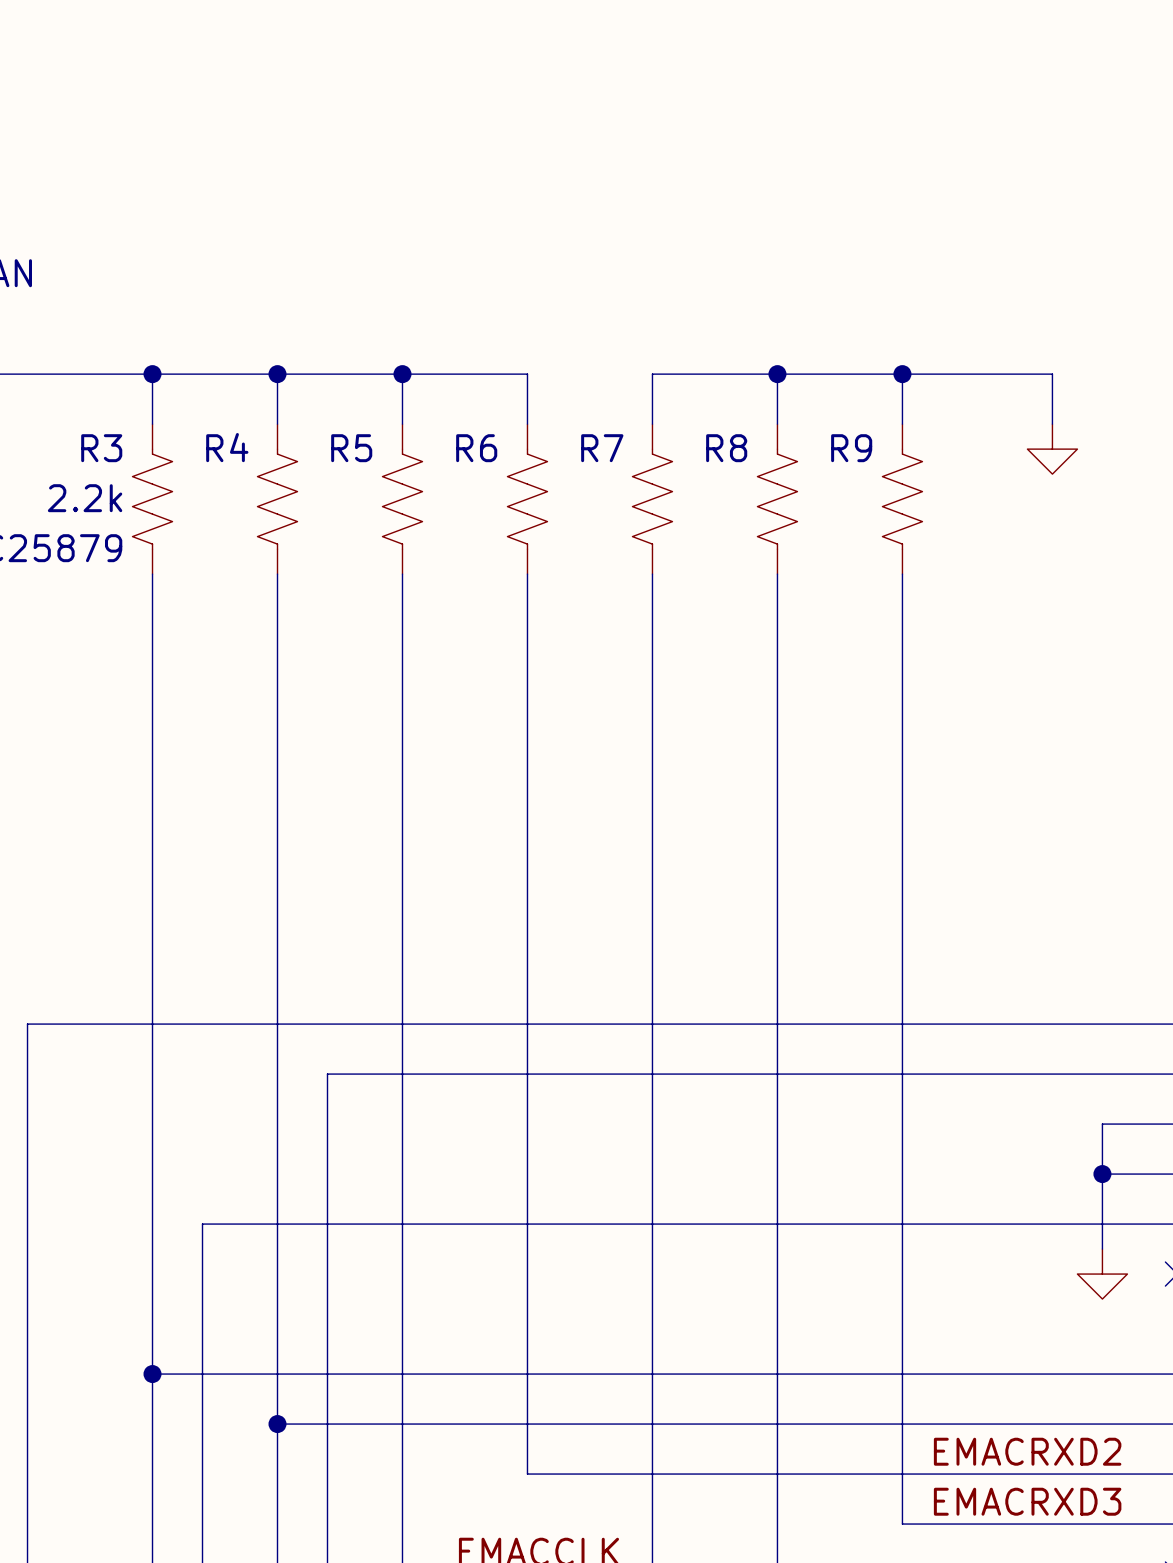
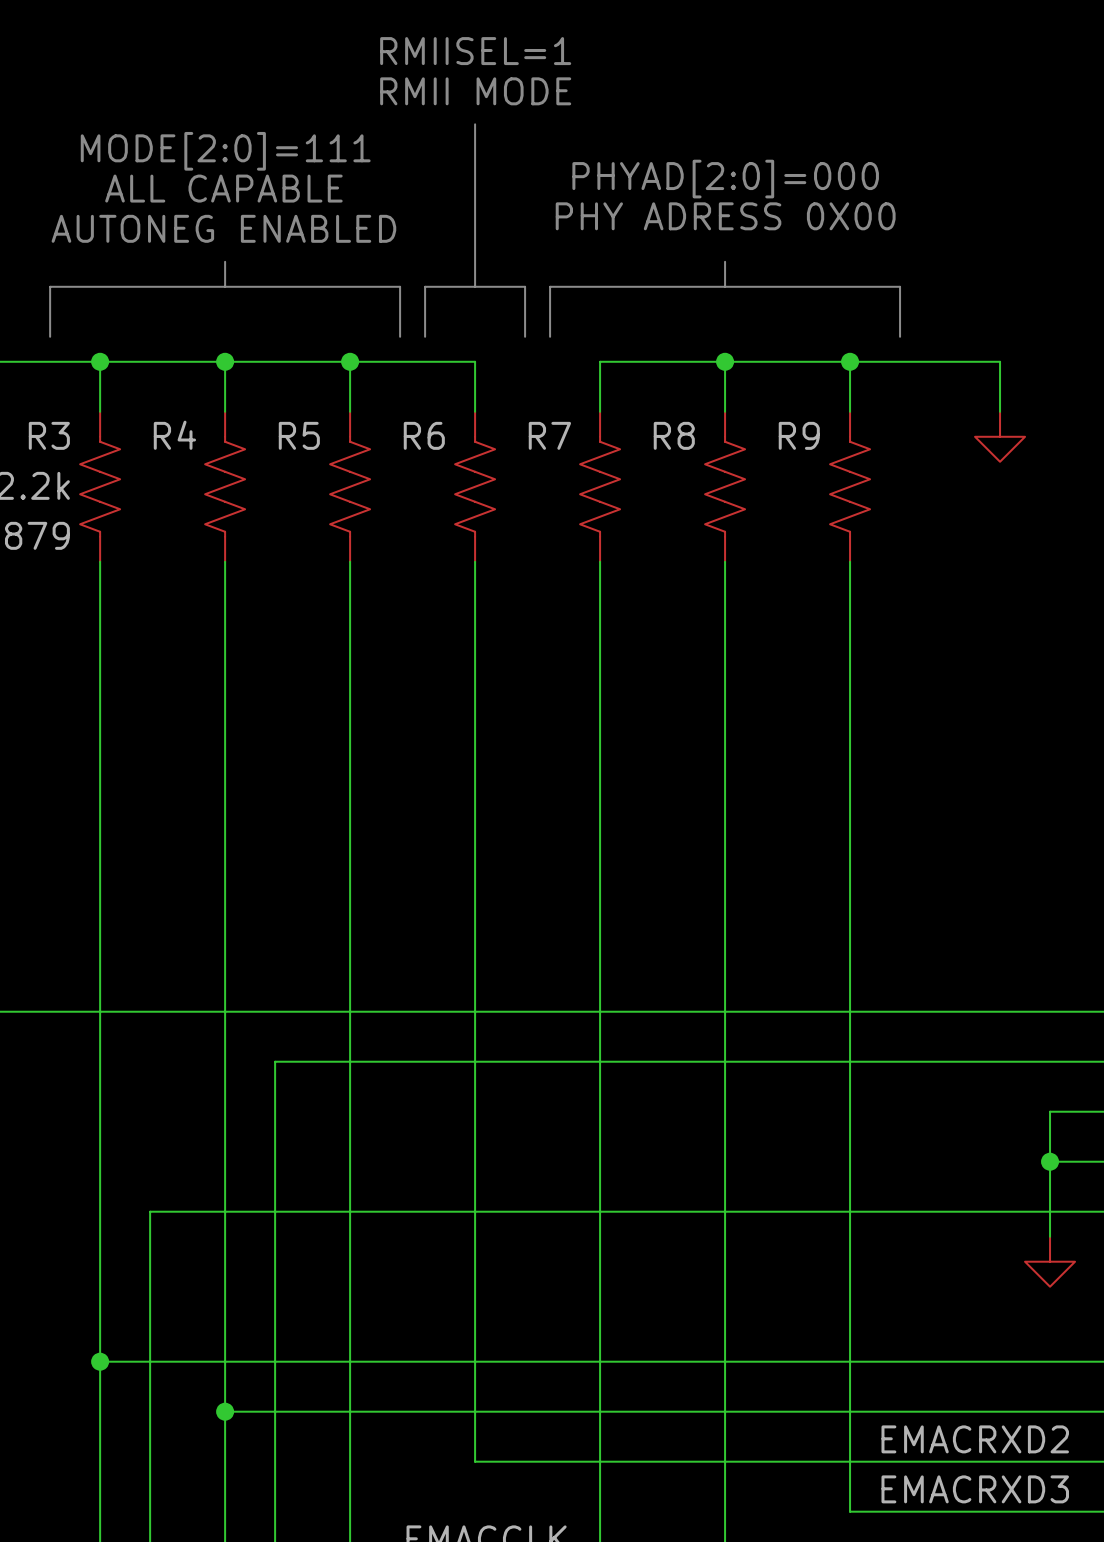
text: none -> RMIISEL=1 (475, 51)
text: none -> RMII MODE (475, 91)
line: none -> (475, 124) (475, 286)
text: none -> MODE[2:0]=111 (225, 151)
text: none -> PHYAD[2:0]=000 (725, 179)
text: none -> ALL CAPABLE (223, 188)
text: none -> PHY ADRESS 0X00 (725, 216)
text: none -> AUTONEG ENABLED (223, 228)
line: none -> (225, 261) (225, 286)
line: none -> (725, 261) (725, 286)
line: none -> (50, 336) (50, 286) (400, 286) (400, 336)
line: none -> (425, 336) (425, 286) (525, 286) (525, 336)
line: none -> (550, 336) (550, 286) (900, 286) (900, 336)

